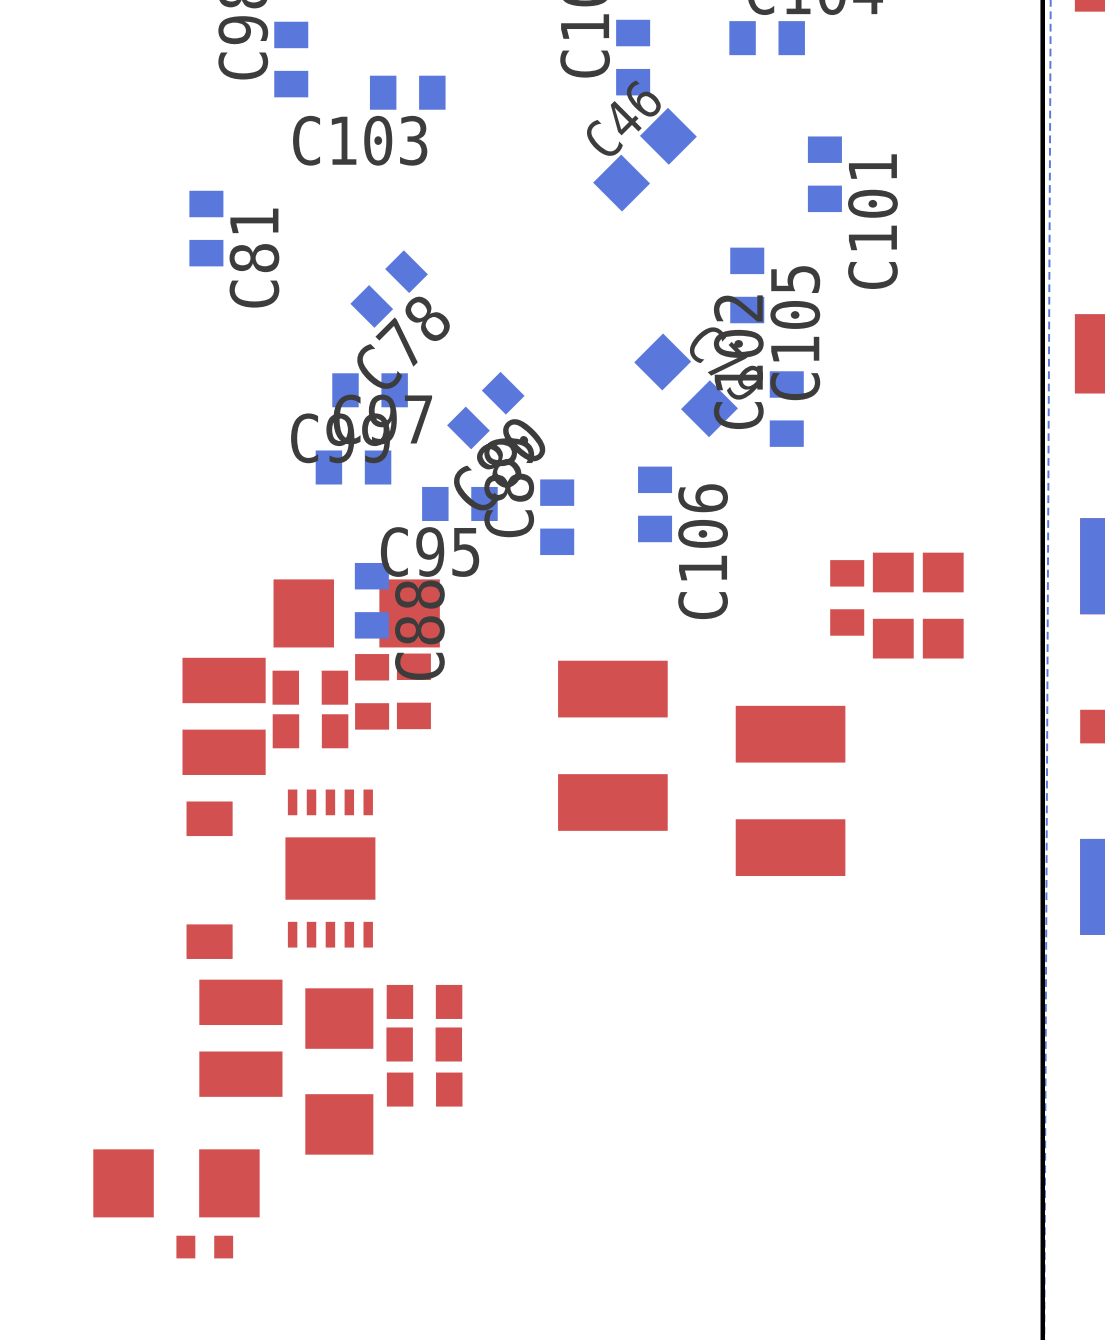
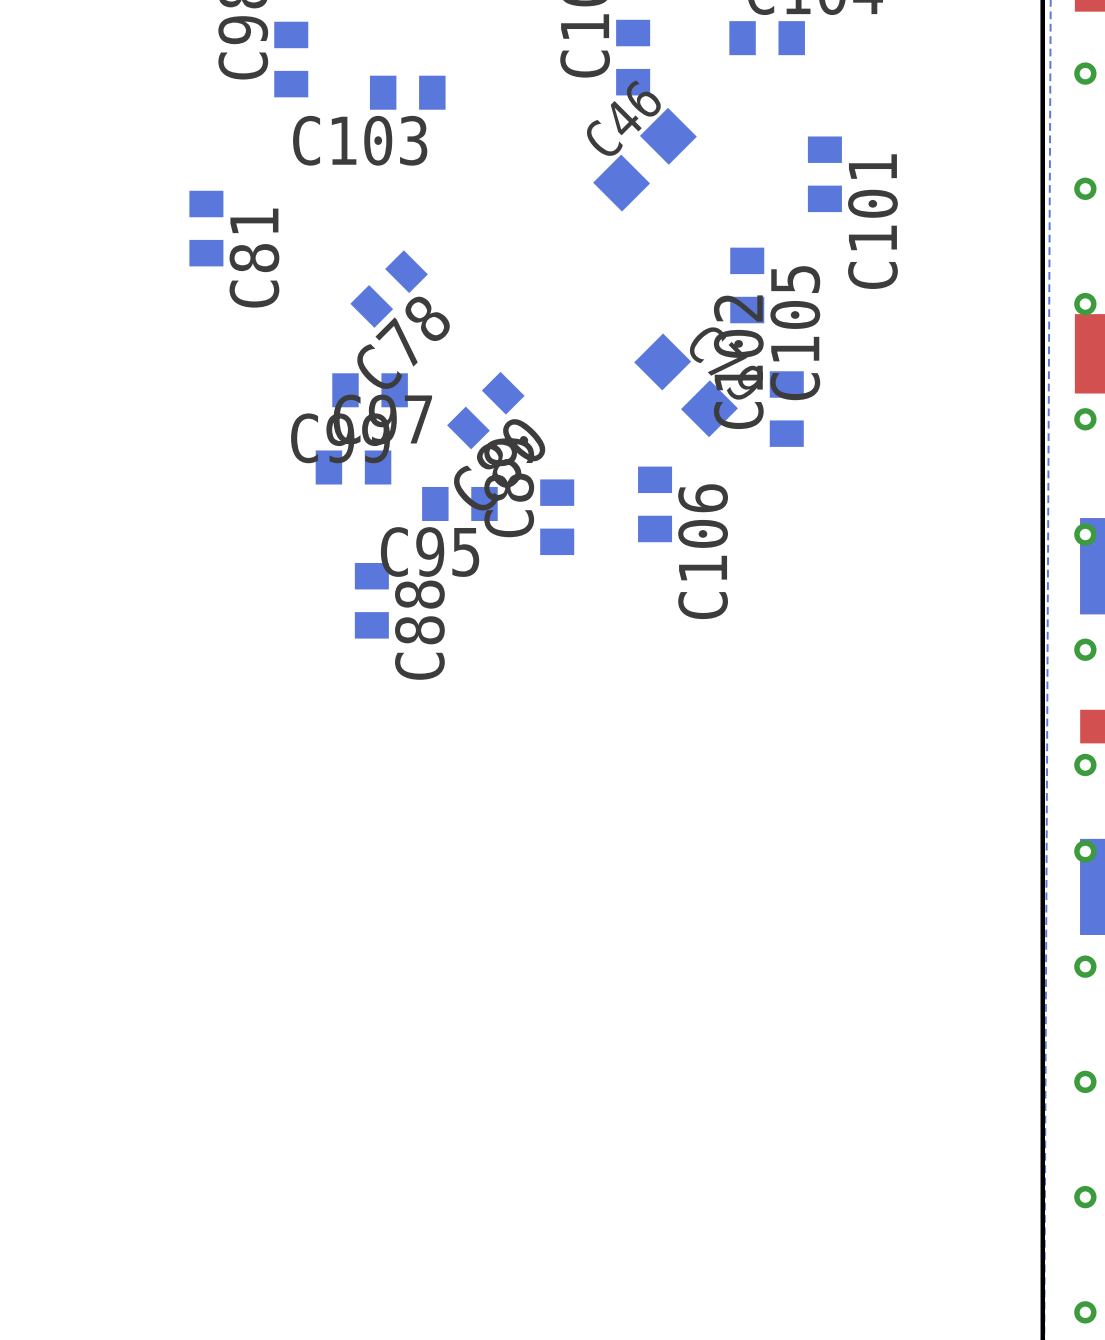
via: none -> (1085, 73)
via: none -> (1085, 188)
via: none -> (1085, 304)
via: none -> (1085, 419)
via: none -> (1085, 534)
part: (847, 597) -> none
part: (893, 605) -> none
part: (943, 605) -> none
part: (356, 613) -> none
via: none -> (1085, 649)
part: (310, 687) -> none
part: (372, 691) -> none
part: (413, 691) -> none
part: (224, 716) -> none
part: (310, 731) -> none
part: (612, 745) -> none
via: none -> (1085, 764)
part: (790, 790) -> none
via: none -> (1085, 851)
part: (330, 868) -> none
part: (209, 880) -> none
via: none -> (1085, 966)
part: (424, 1001) -> none
part: (240, 1038) -> none
part: (424, 1044) -> none
part: (339, 1071) -> none
via: none -> (1085, 1081)
part: (424, 1089) -> none
part: (176, 1183) -> none
via: none -> (1085, 1197)
part: (204, 1247) -> none
via: none -> (1085, 1312)

